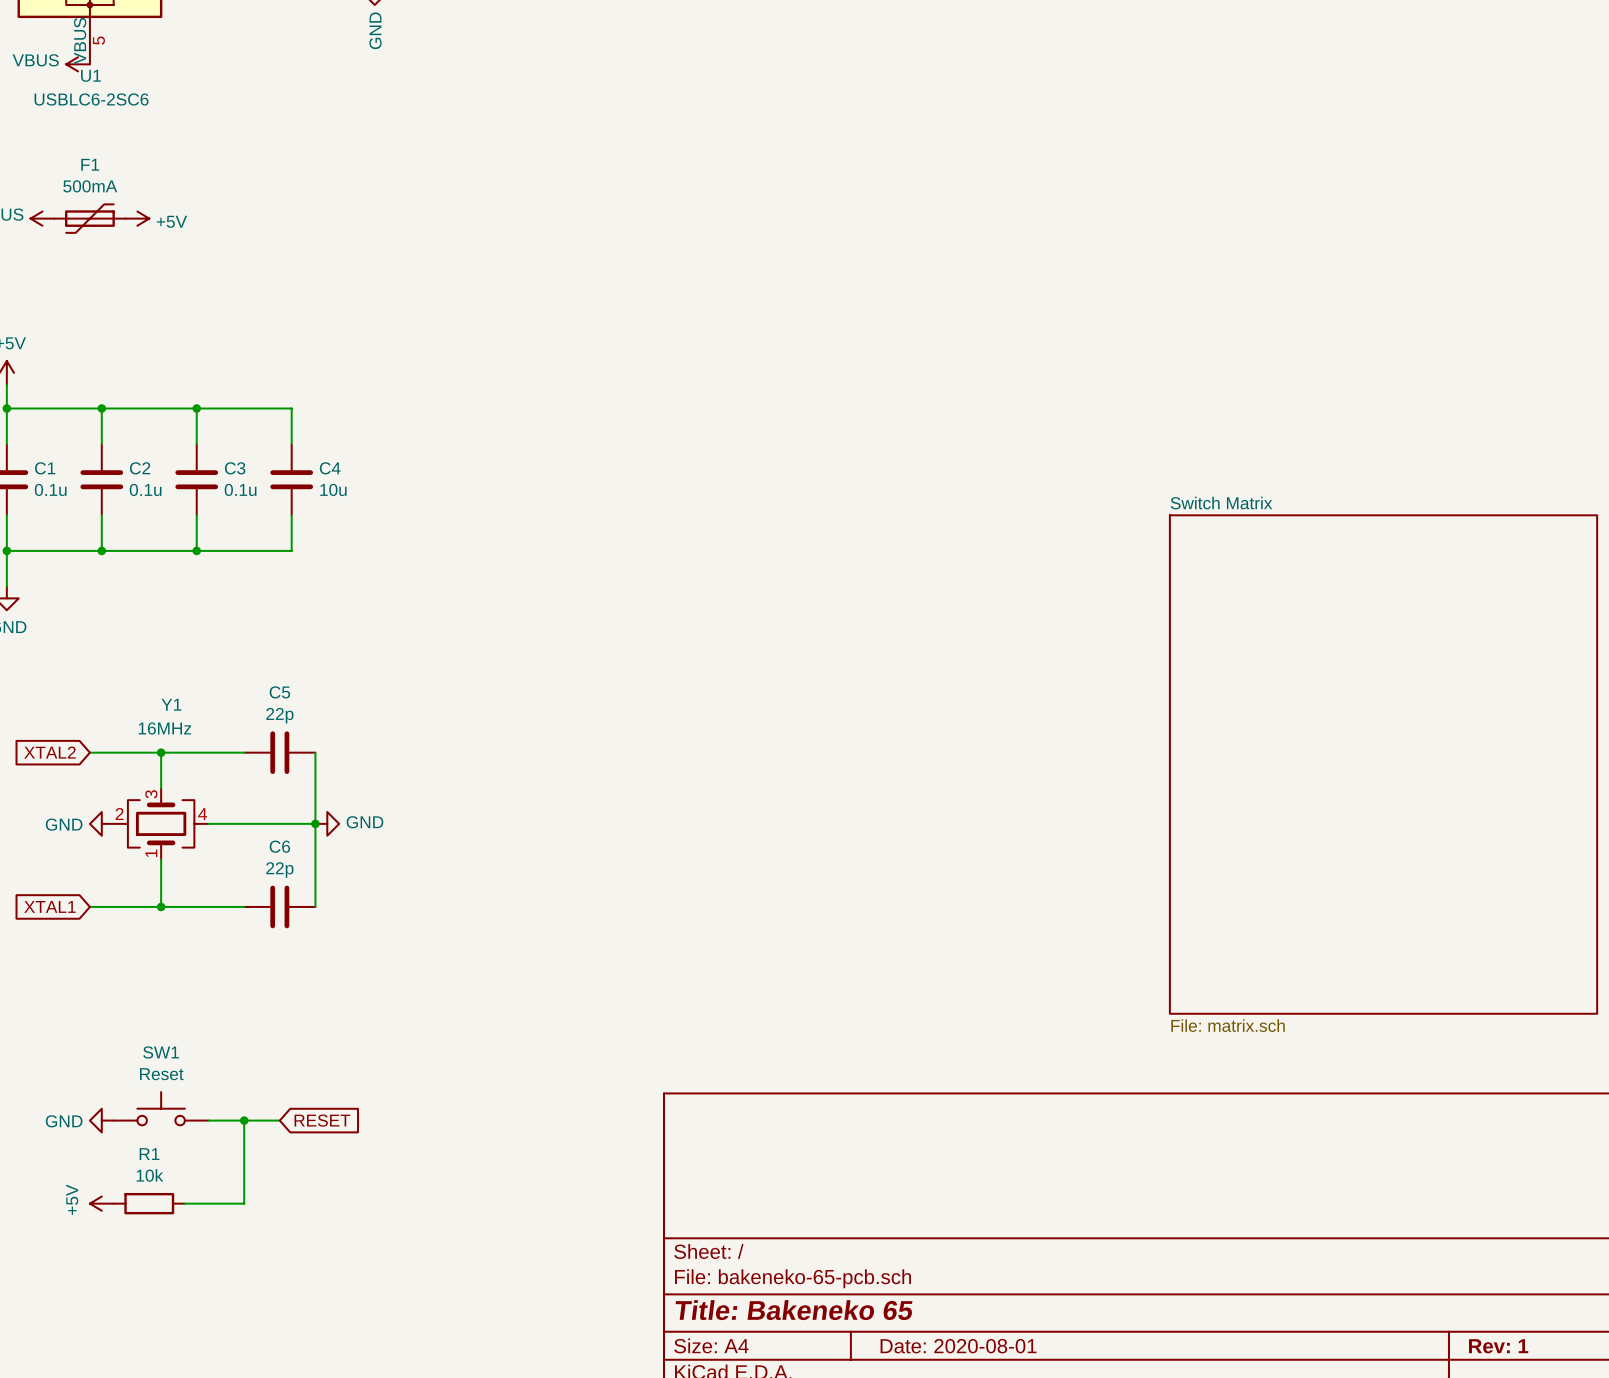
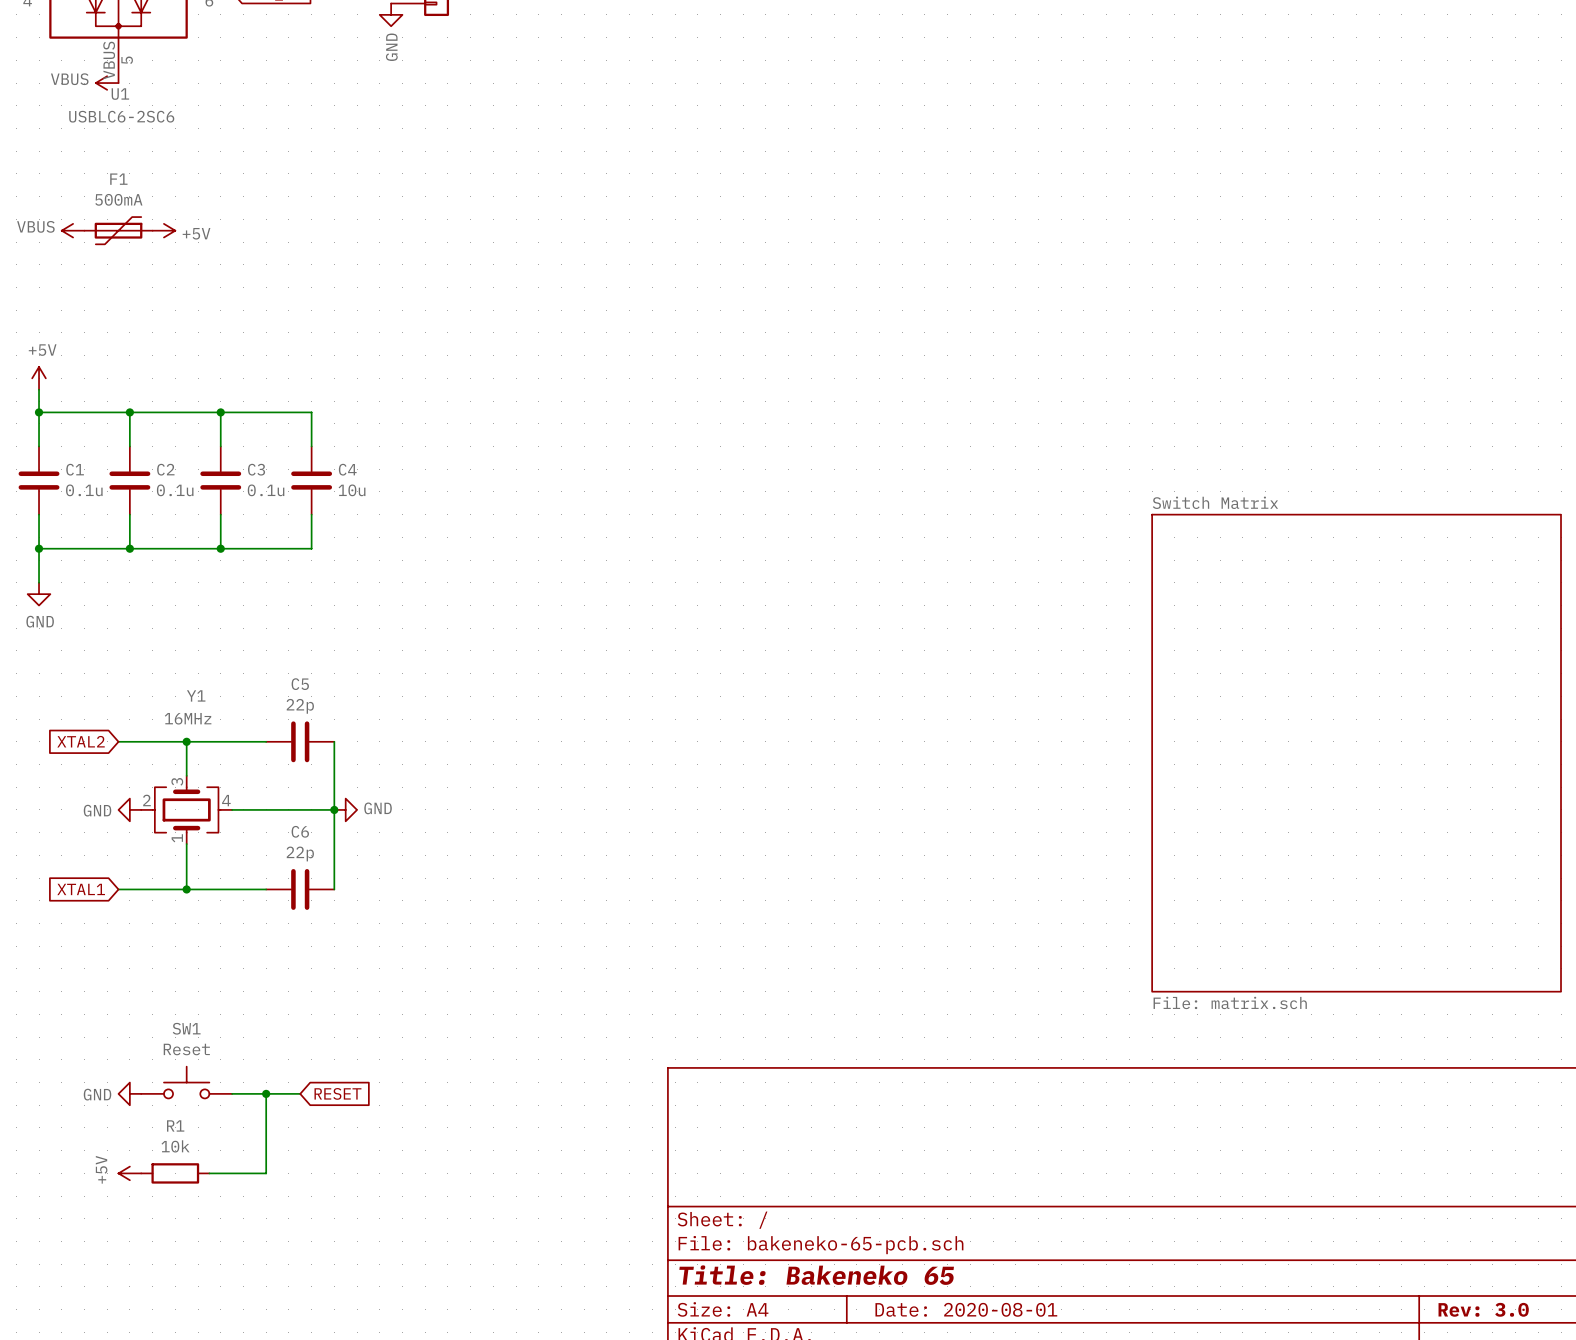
title block: Rev: 1 (1498, 1346) -> Rev: 3.0 (1483, 1309)

